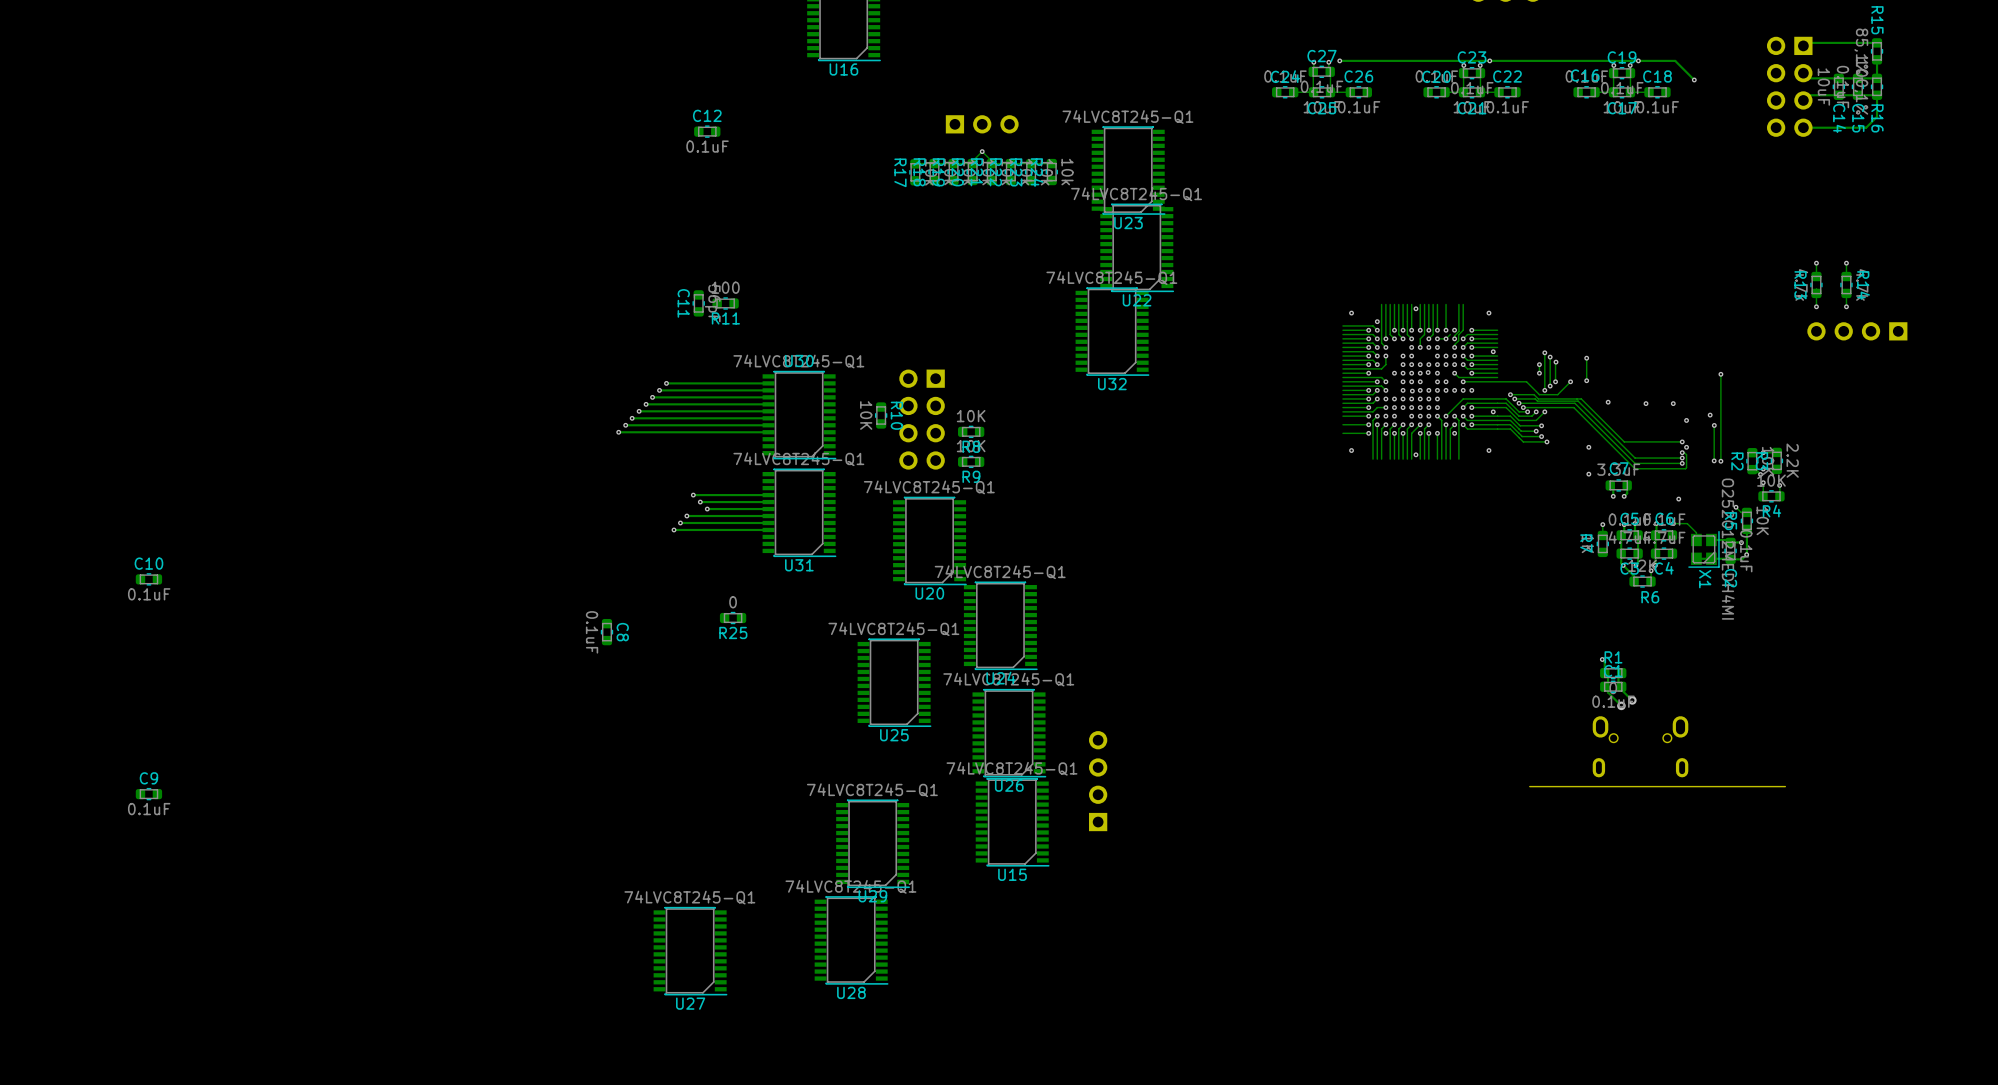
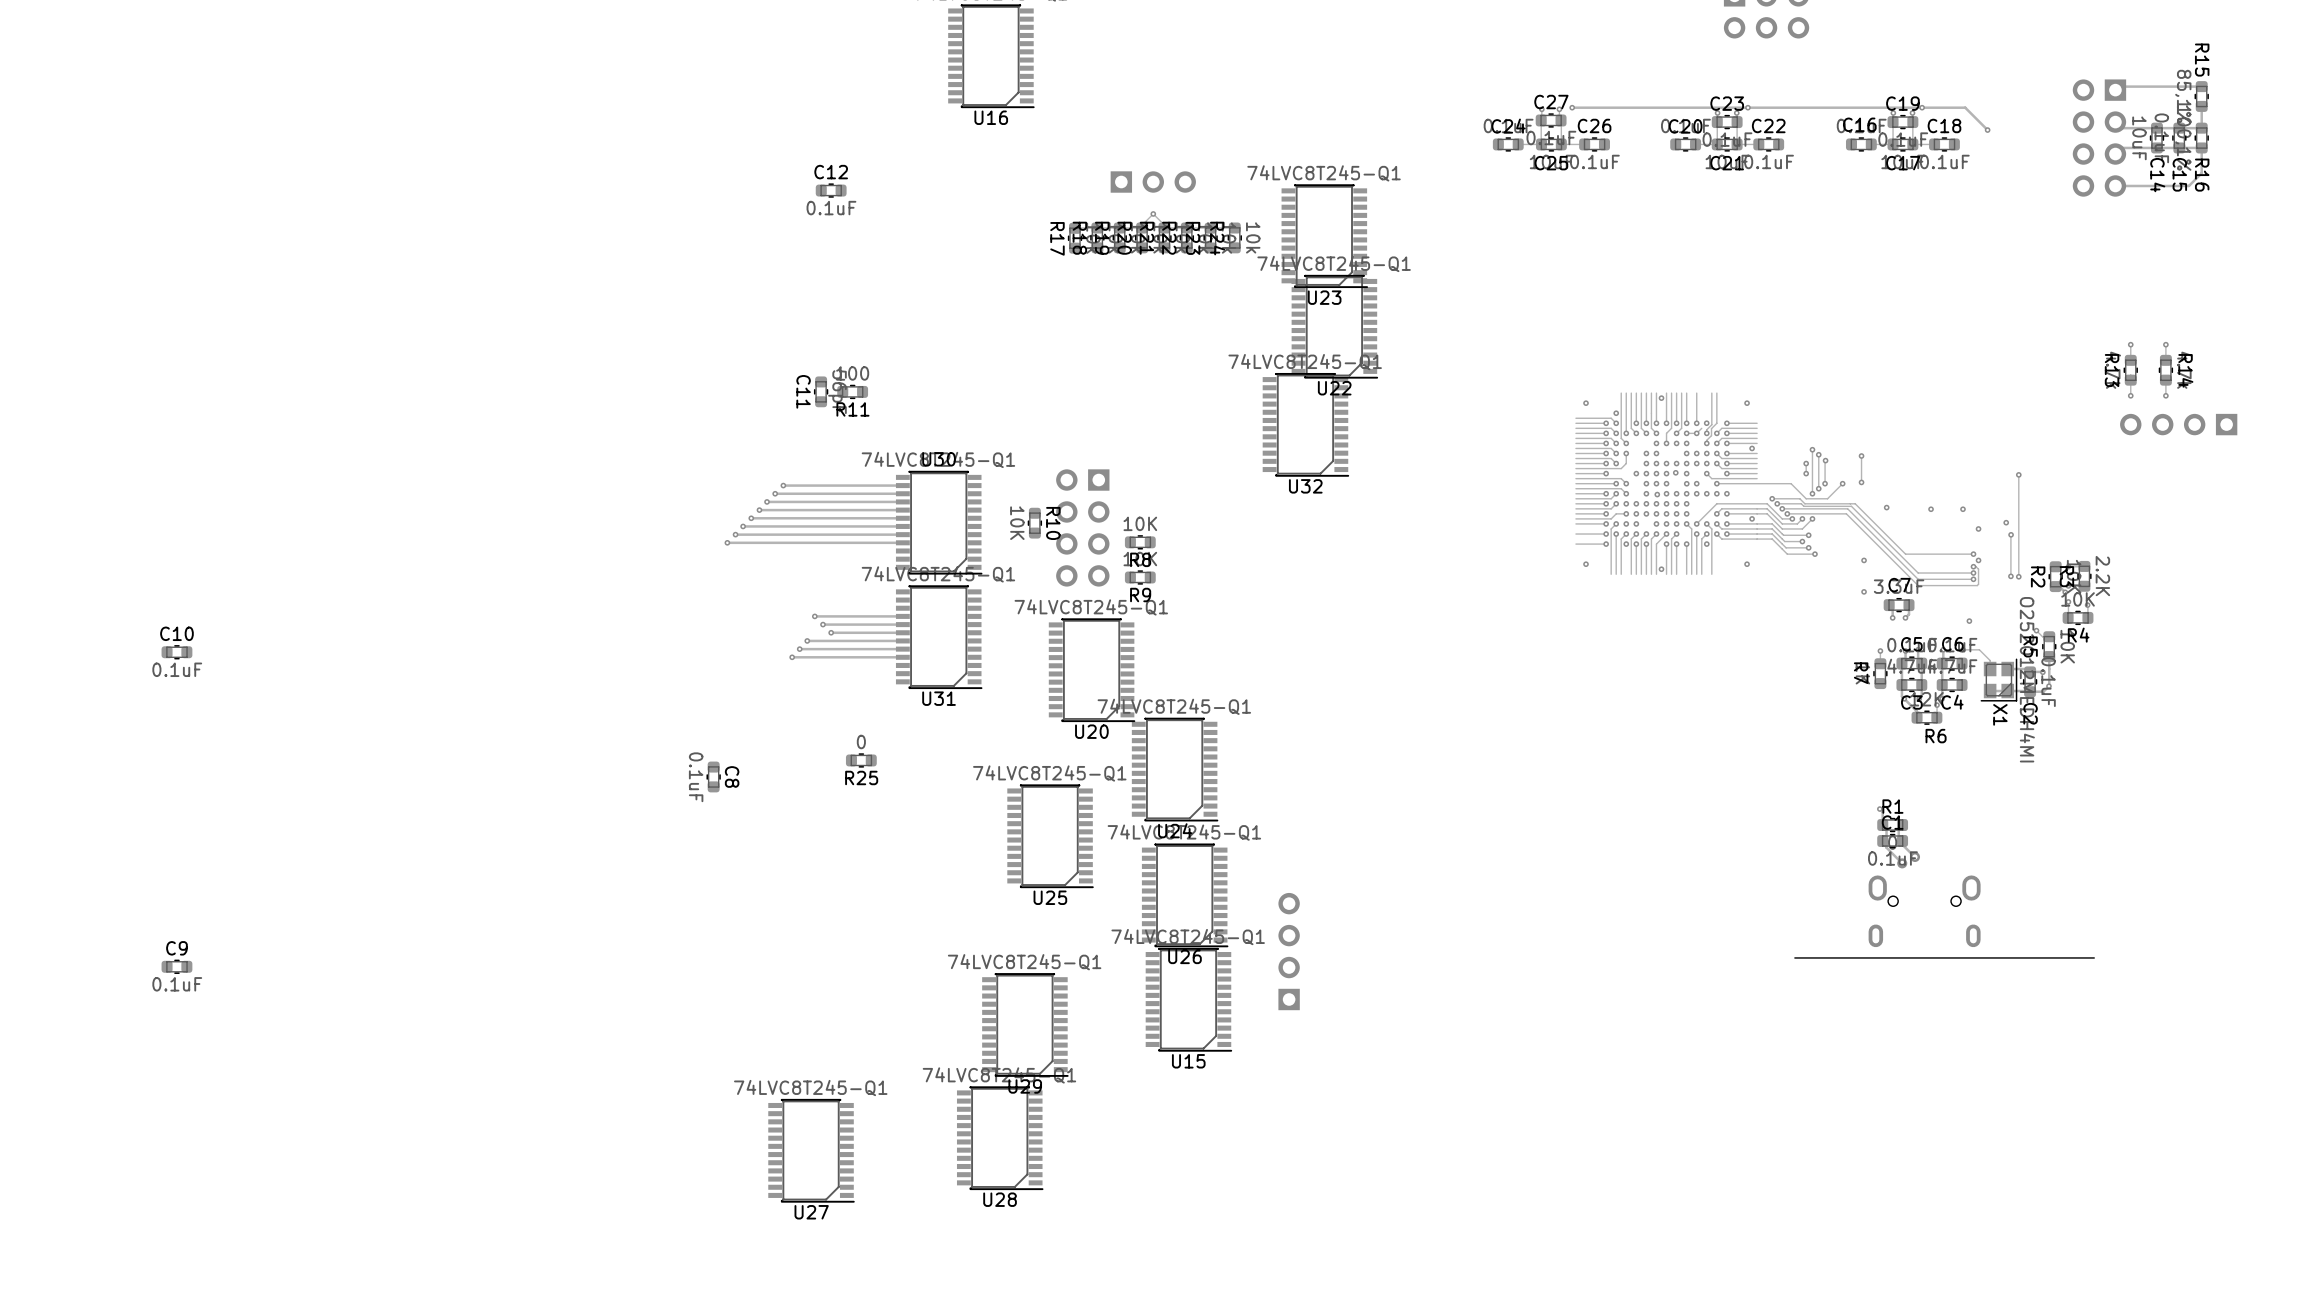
C10 position: (148, 579) -> (176, 652)

